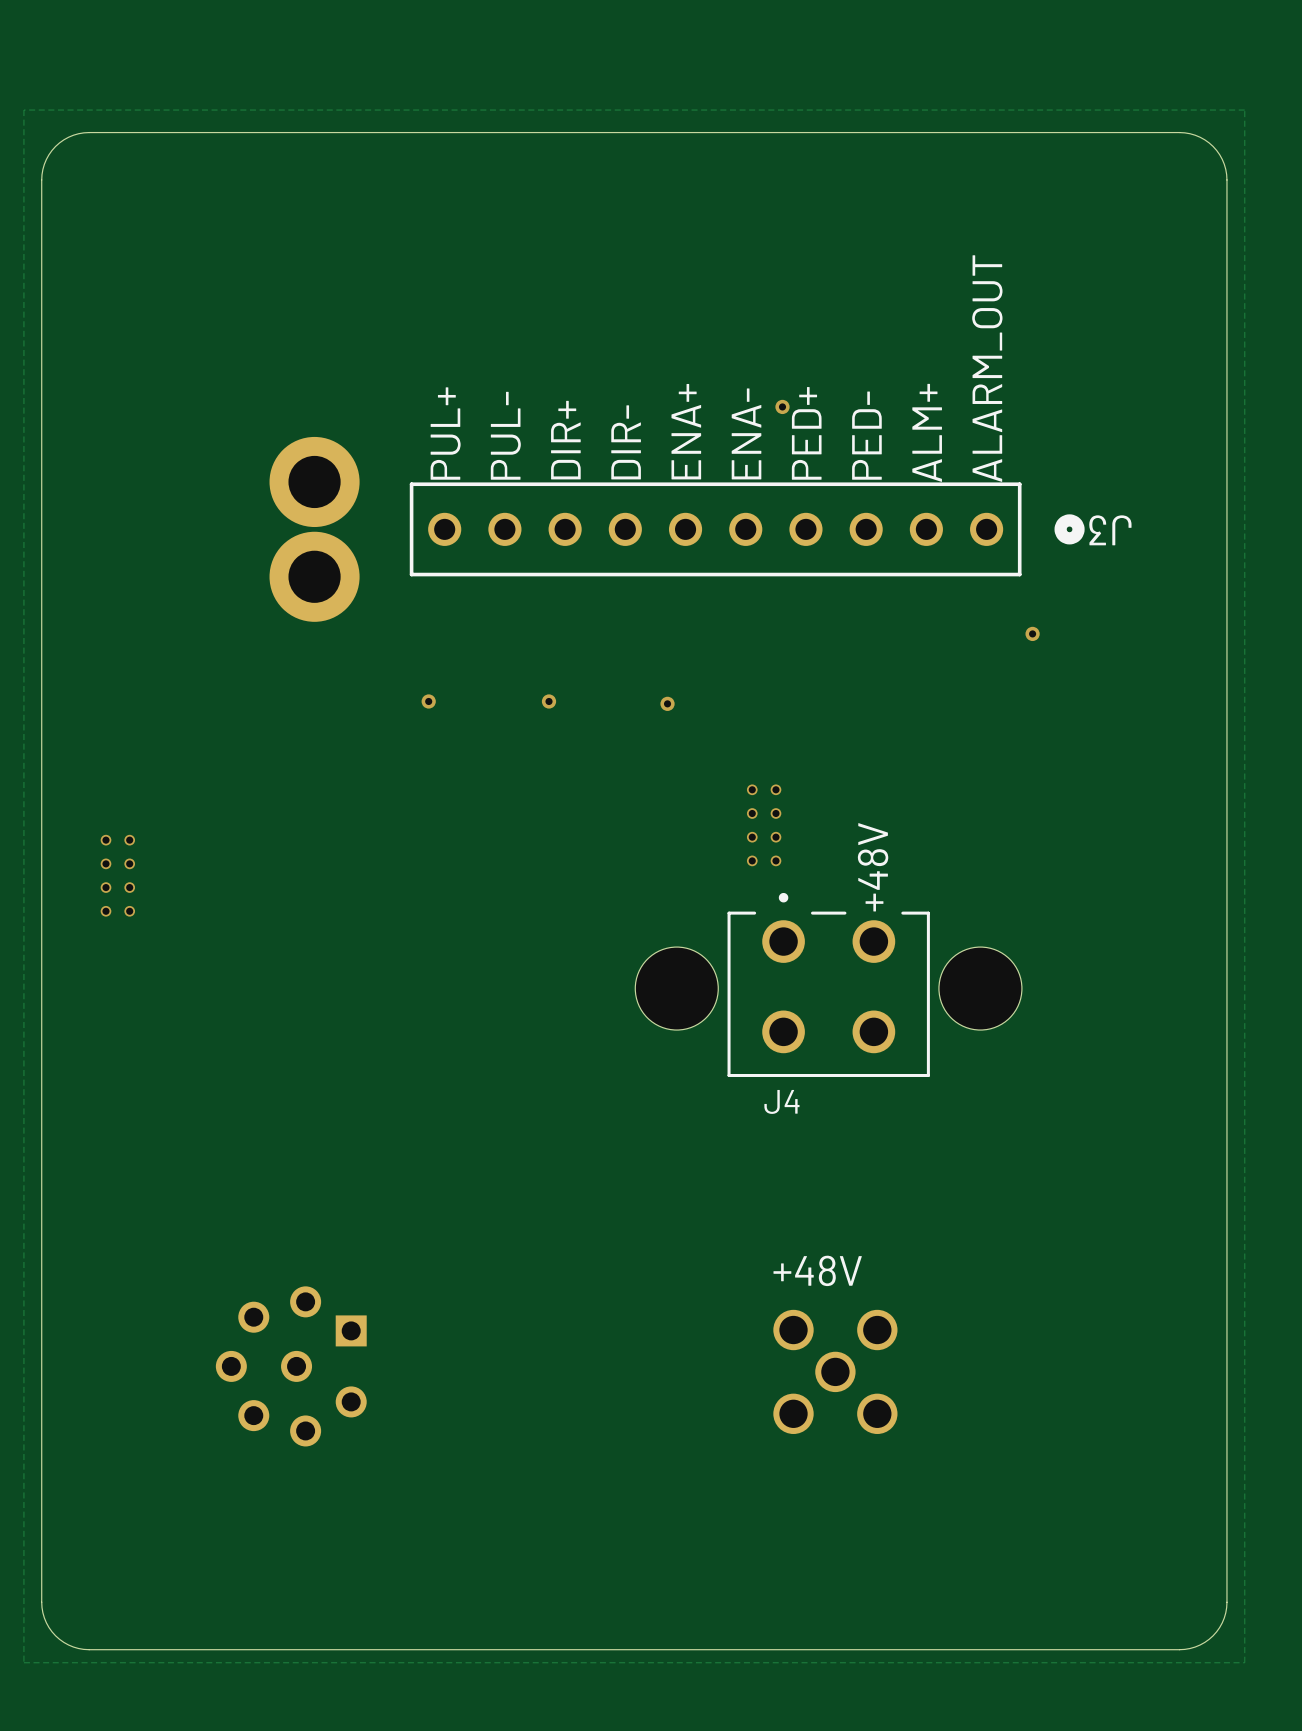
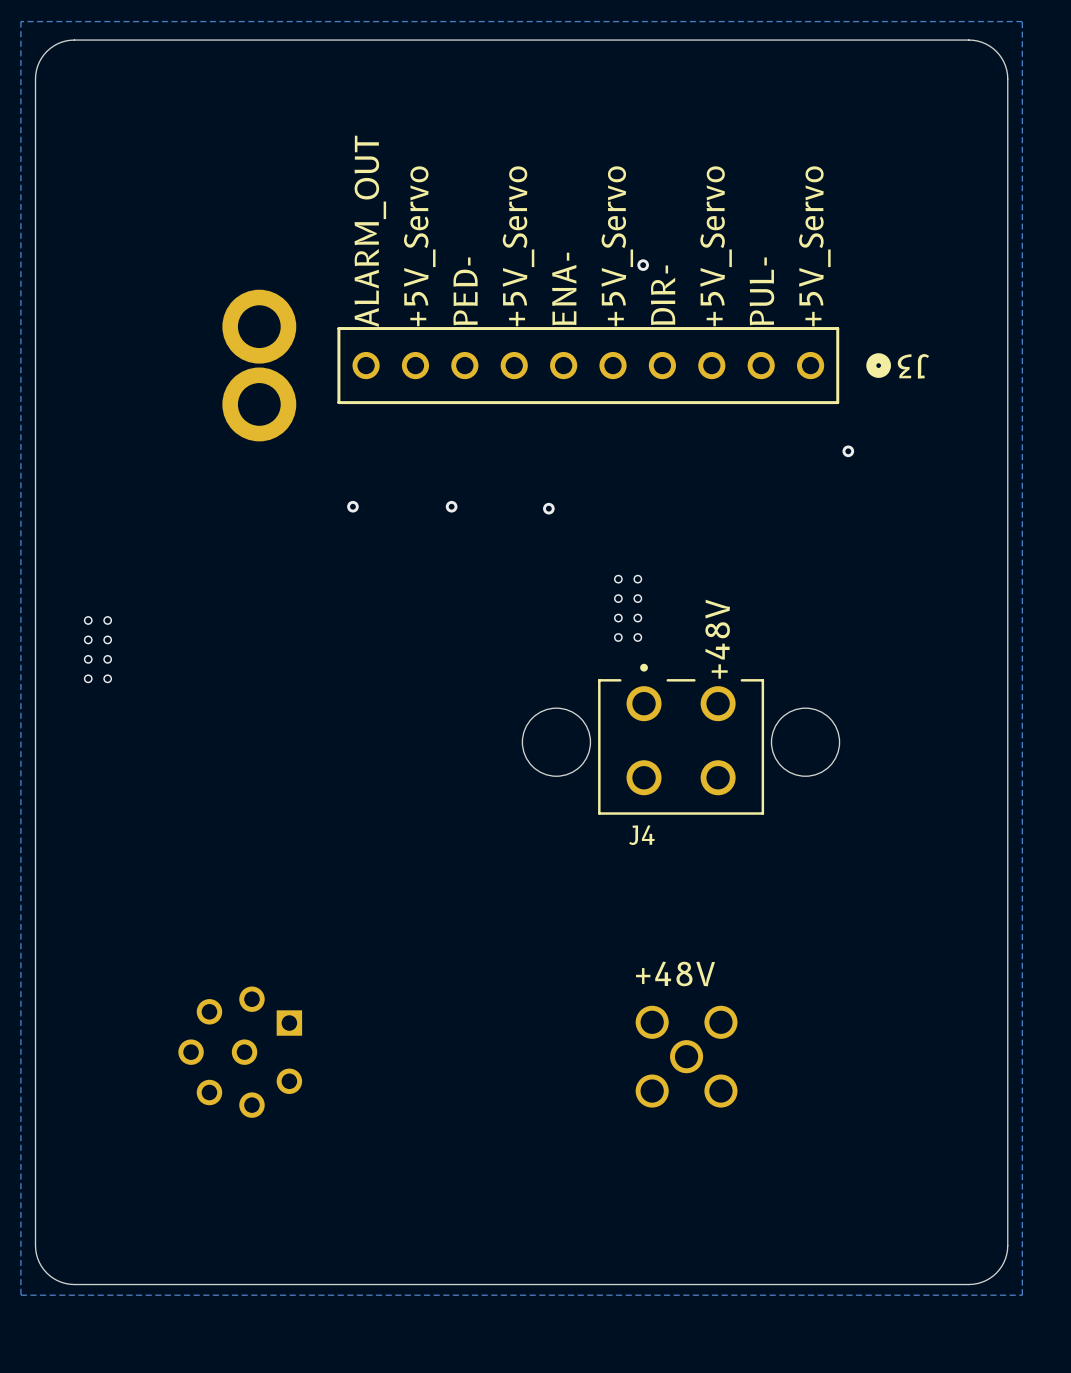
text: ALARM_OUT (987, 368) -> +5V_Servo (814, 246)
text: ENA+ (686, 431) -> ENA- (564, 288)
text: ALM+ (927, 432) -> PUL- (761, 291)
text: PUL+ (445, 433) -> ALARM_OUT (370, 231)
text: ENA- (746, 433) -> +5V_Servo (617, 246)
text: PED+ (806, 433) -> DIR- (663, 295)
text: PUL- (505, 435) -> +5V_Servo (419, 246)
text: PED- (866, 435) -> +5V_Servo (716, 246)
text: DIR+ (565, 440) -> PED- (465, 291)
text: DIR- (626, 442) -> +5V_Servo (518, 246)

